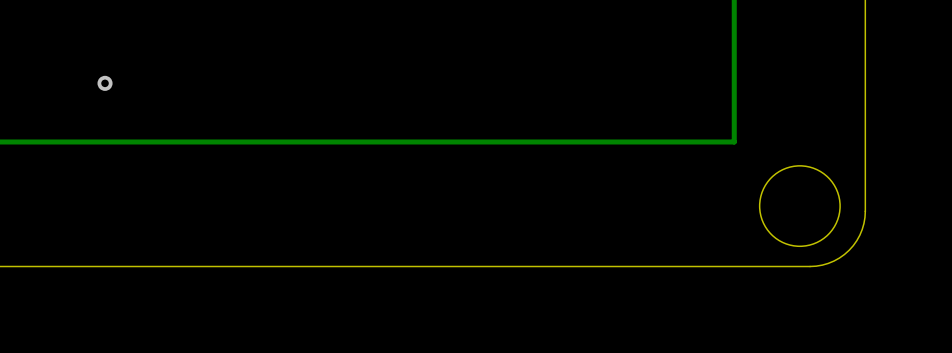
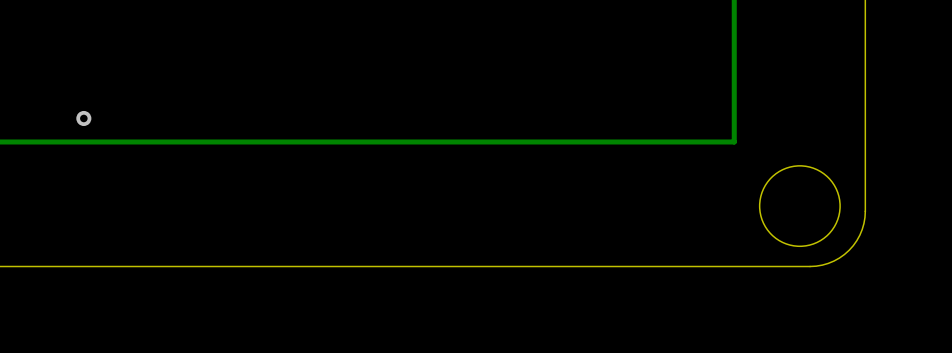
via position: (105, 83) -> (83, 118)

